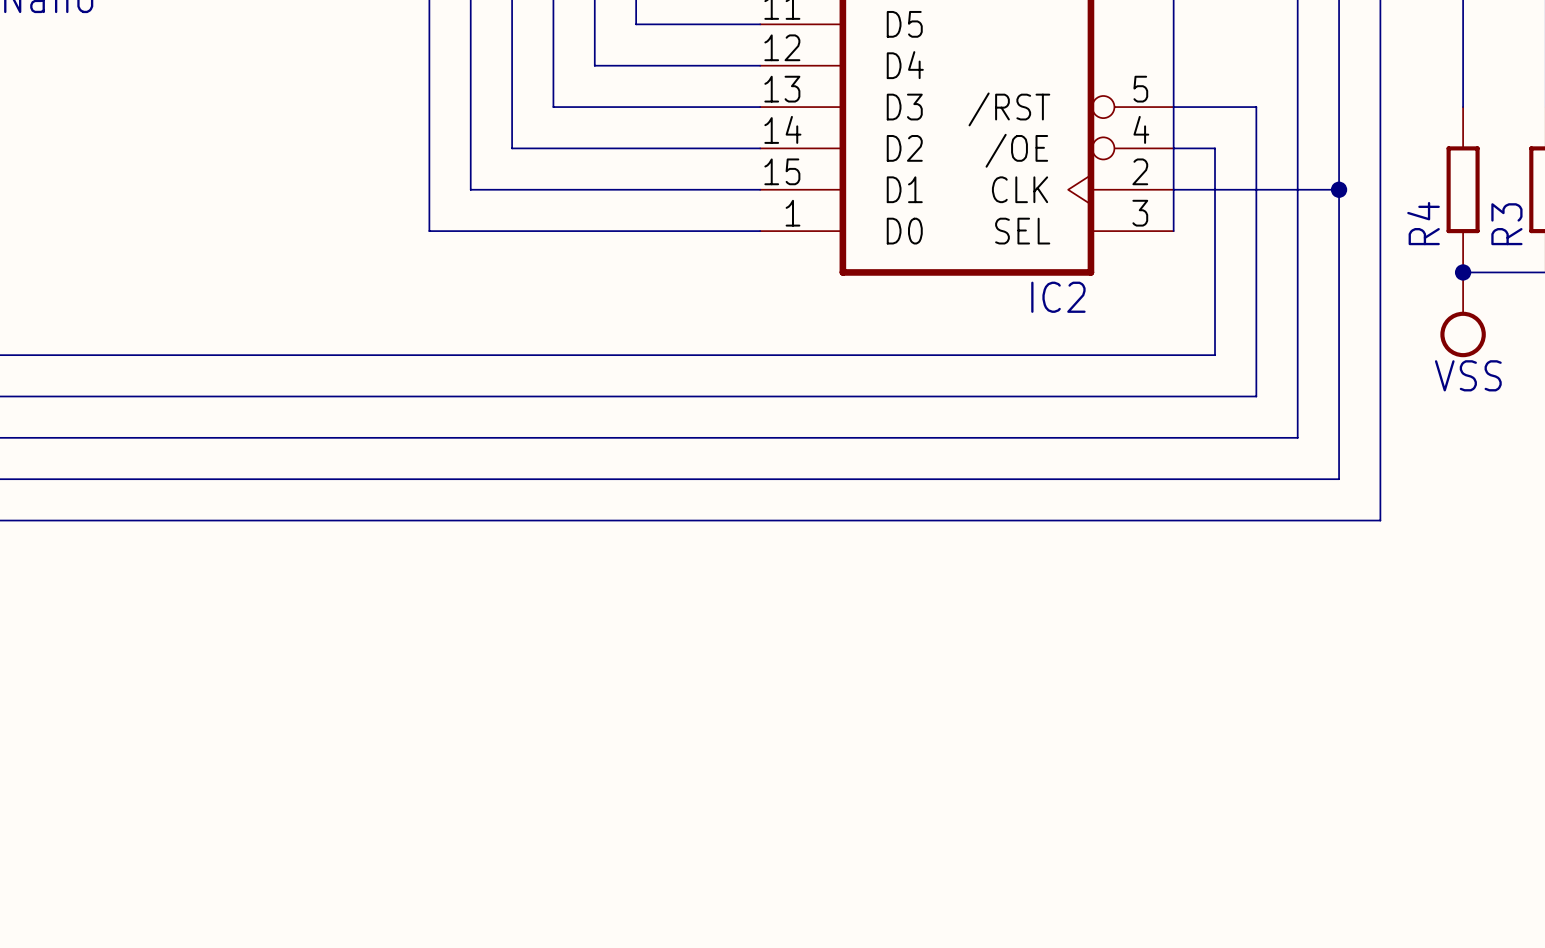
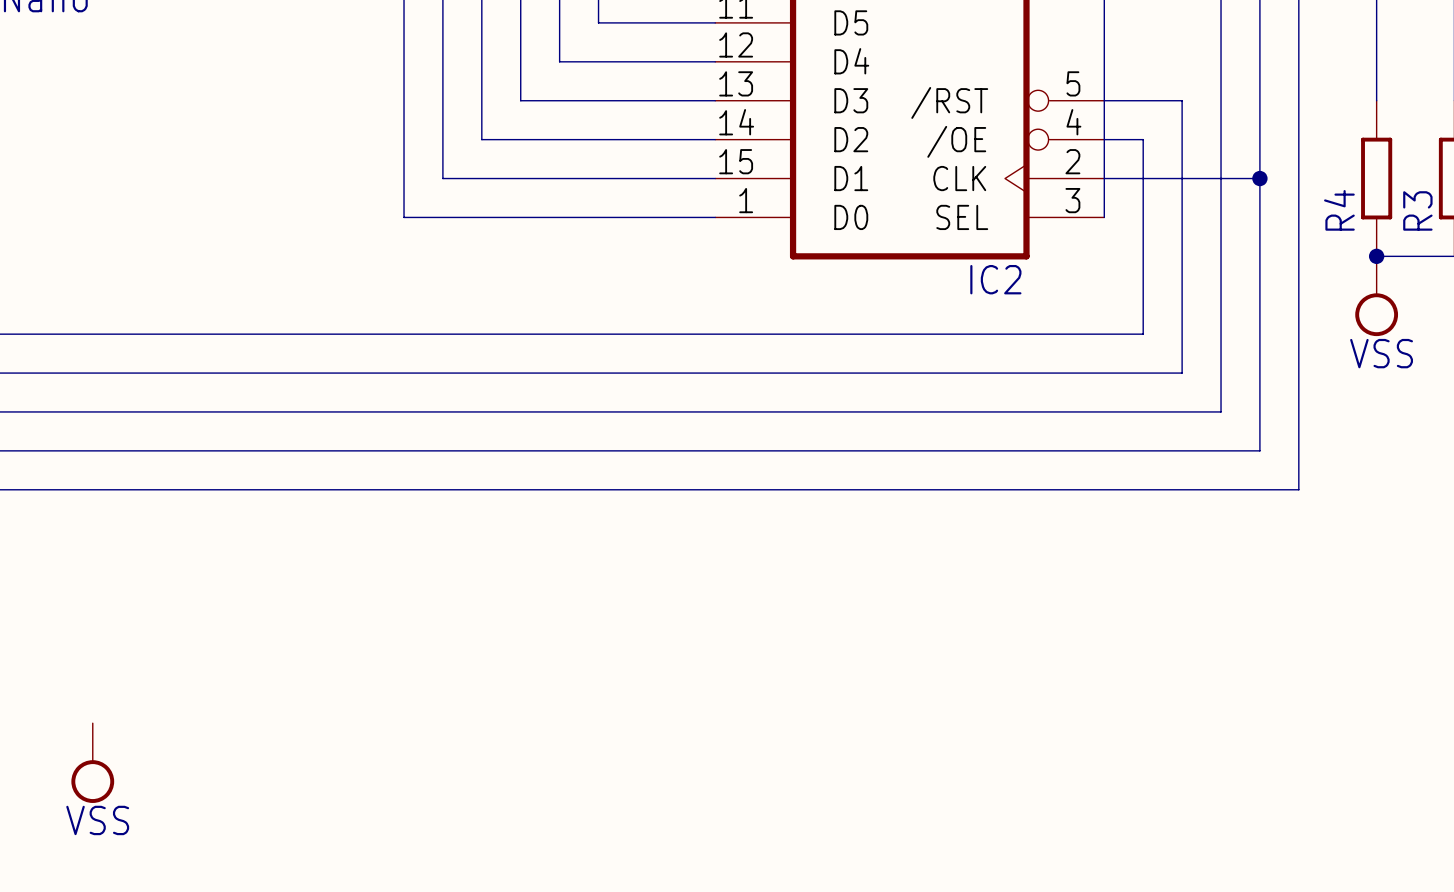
power symbol: none -> VSS (92, 763)

